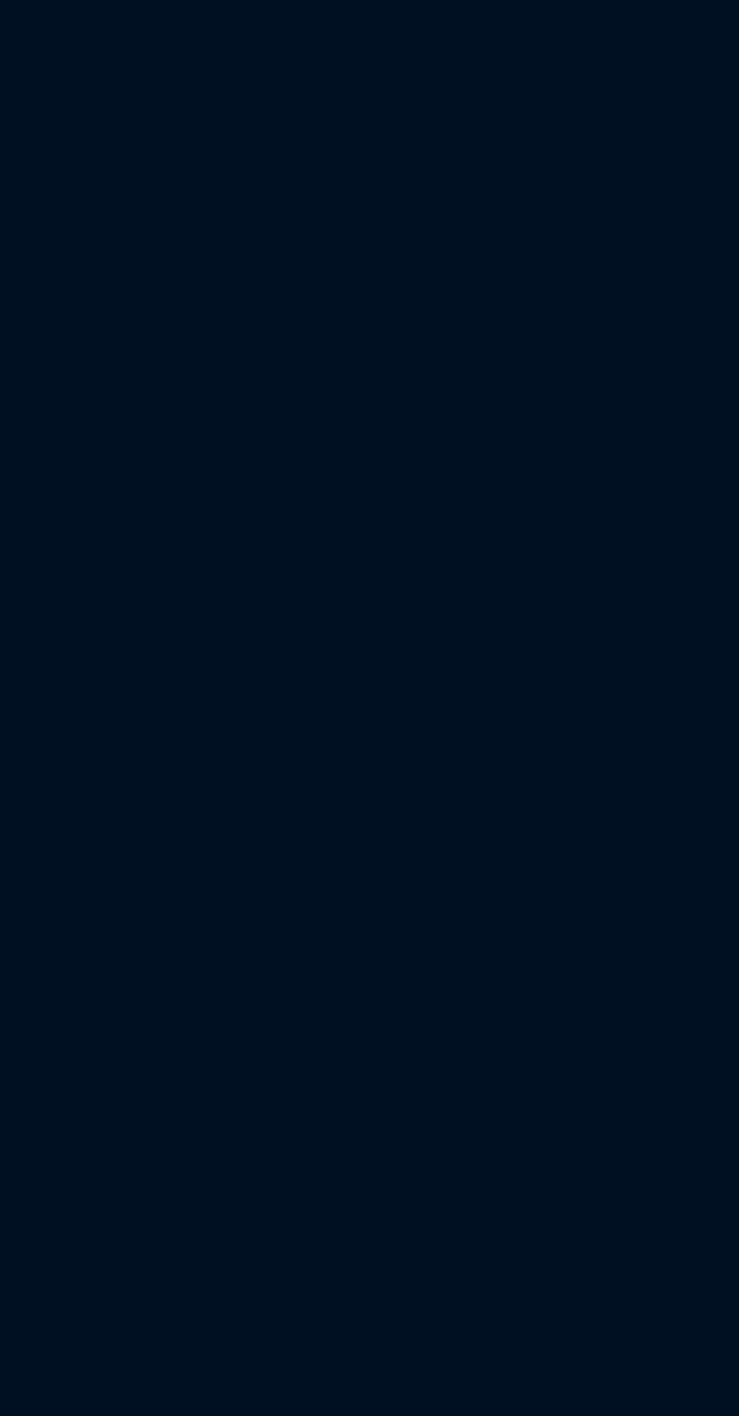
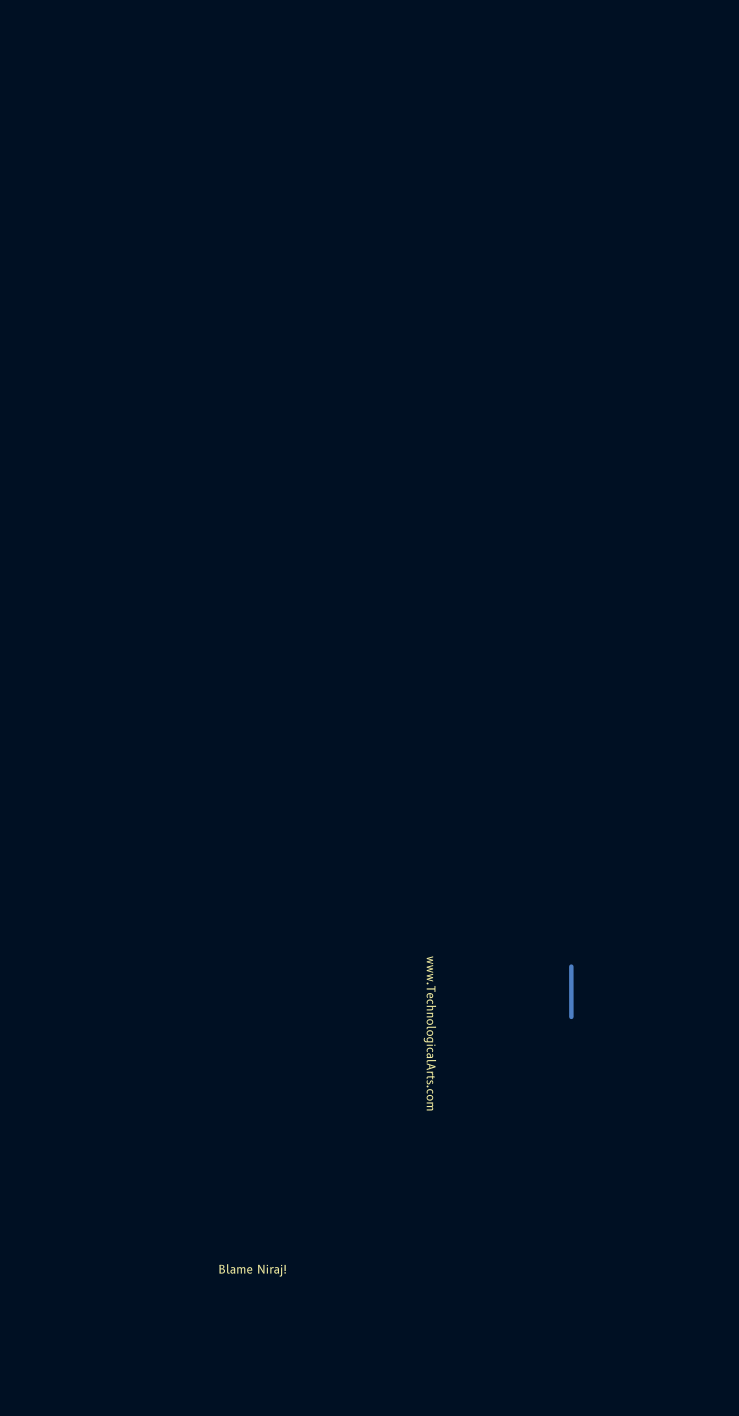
track: none -> (571, 966) (571, 1016)
text: none -> www.TechnologicalArts.com (429, 1033)
text: none -> Blame Niraj! (252, 1270)

